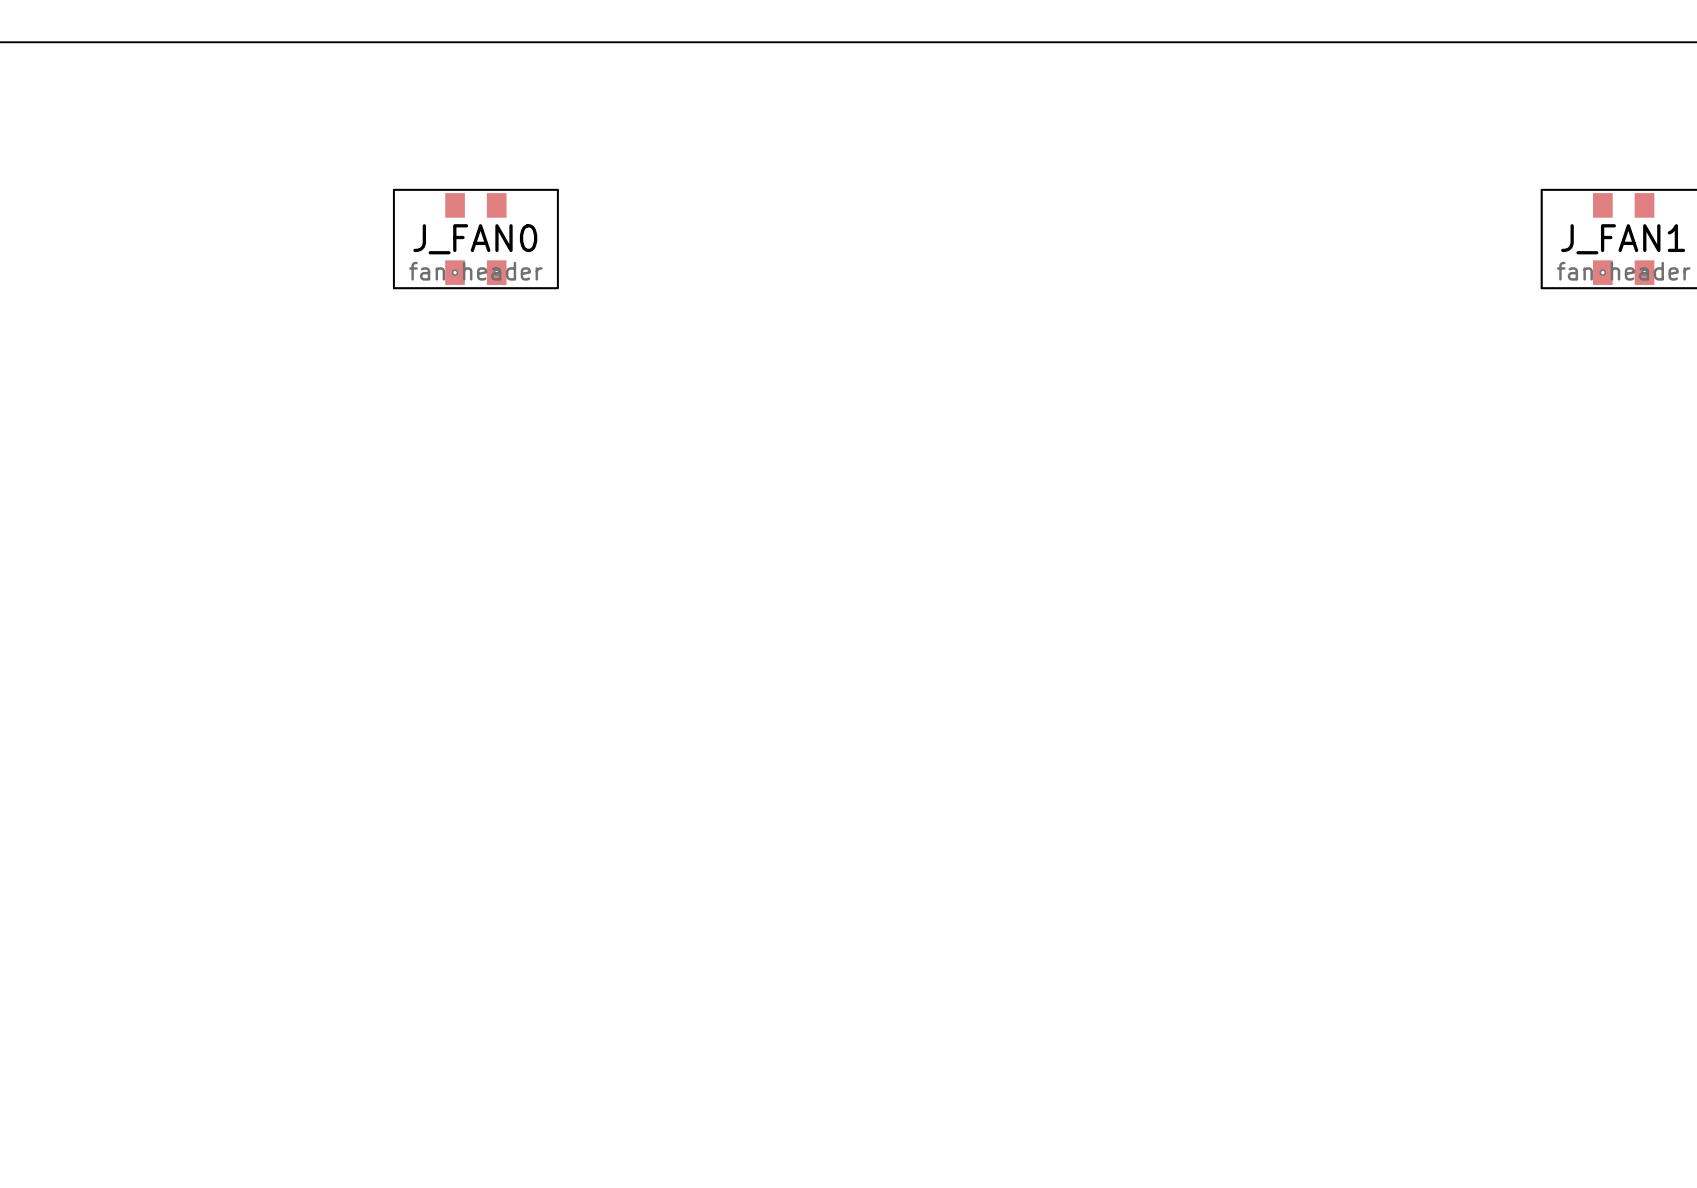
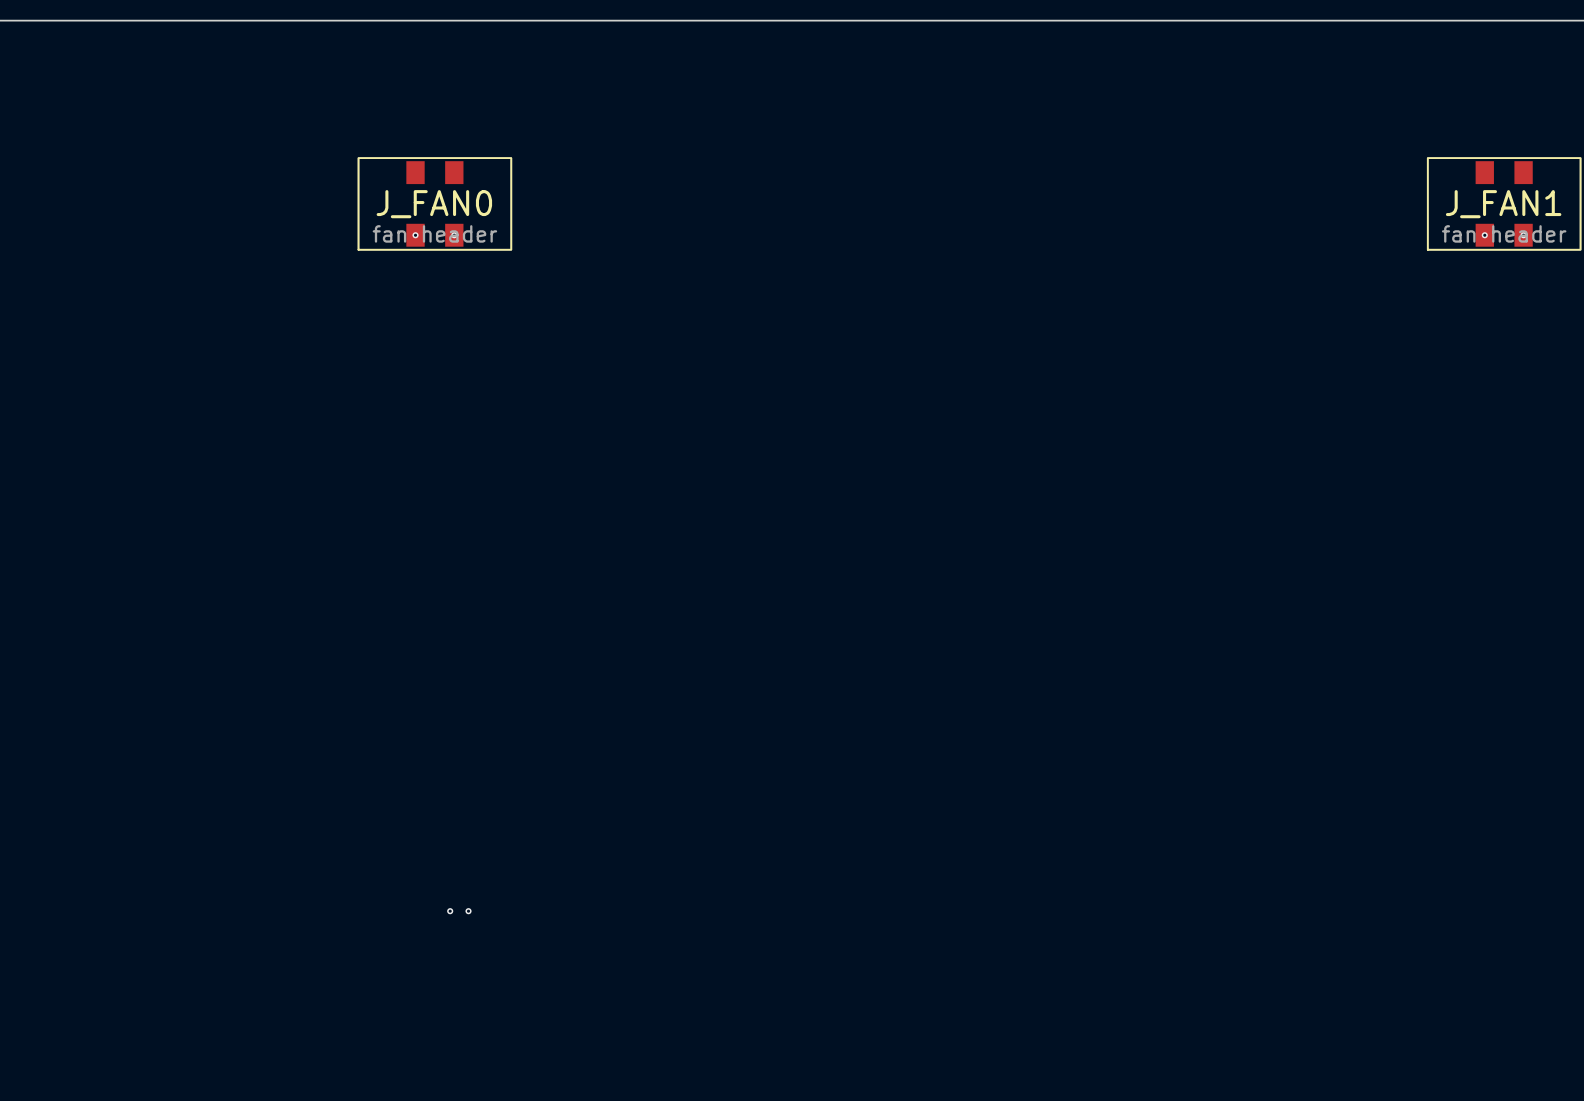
via: none -> (450, 911)
via: none -> (468, 911)

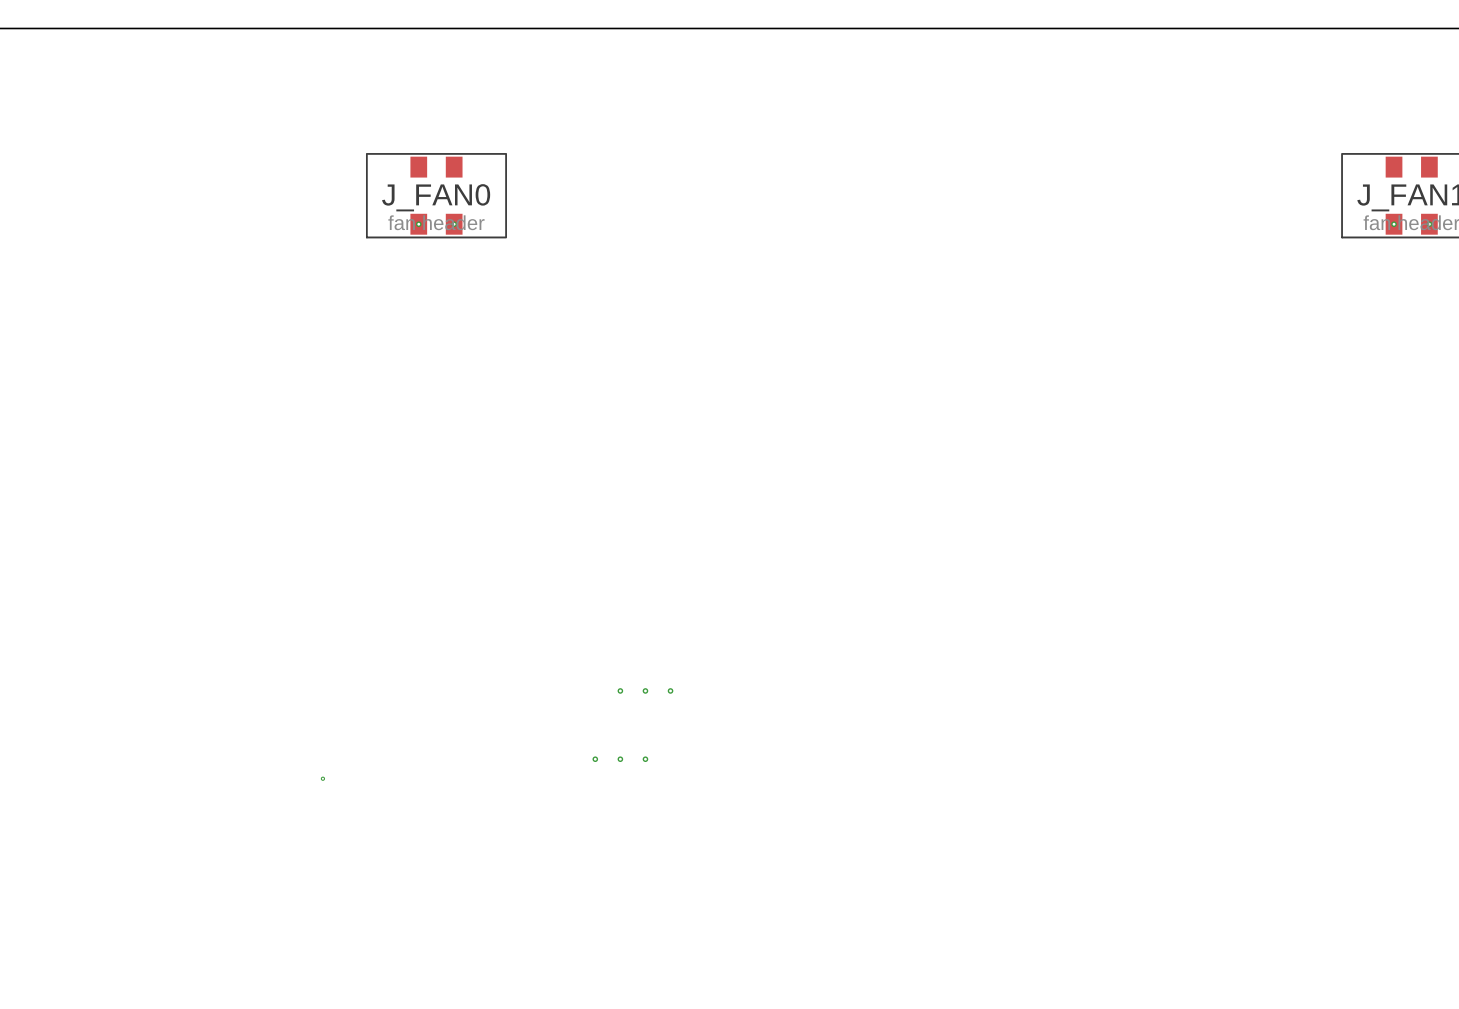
via: none -> (620, 690)
via: none -> (645, 690)
via: none -> (670, 690)
via: none -> (595, 759)
via: none -> (620, 759)
via: none -> (645, 759)
via: none -> (322, 778)
via: (450, 911) -> none
via: (468, 911) -> none

